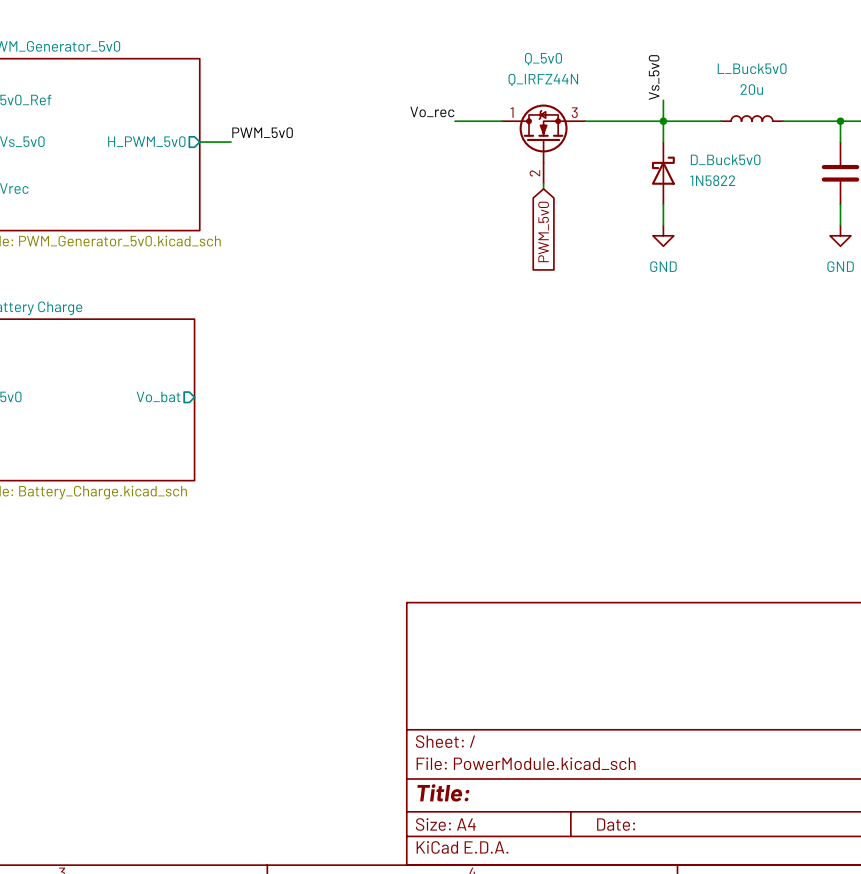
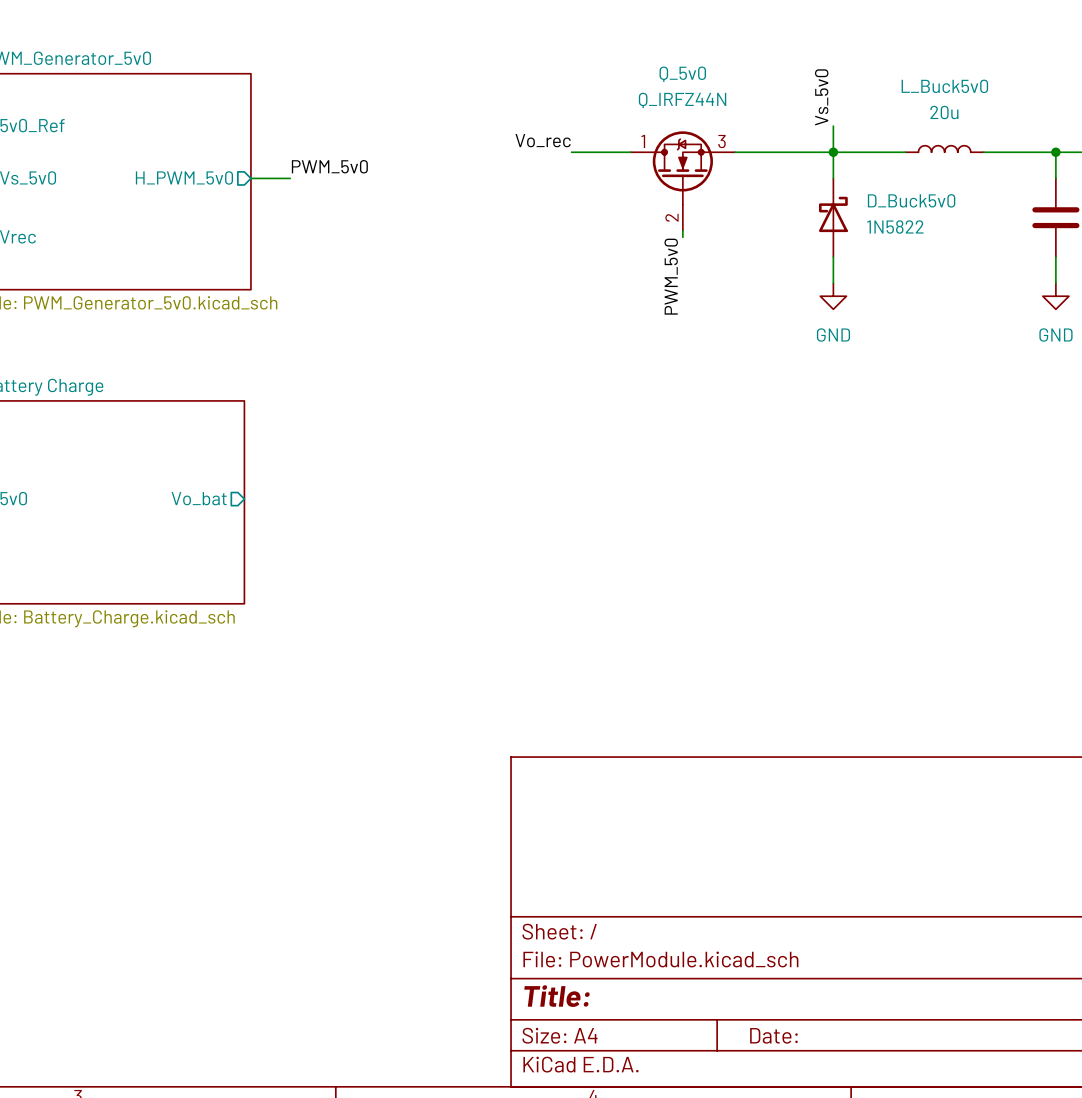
label: none -> PWM_5v0 (671, 276)
global label: PWM_5v0 (543, 231) -> none

